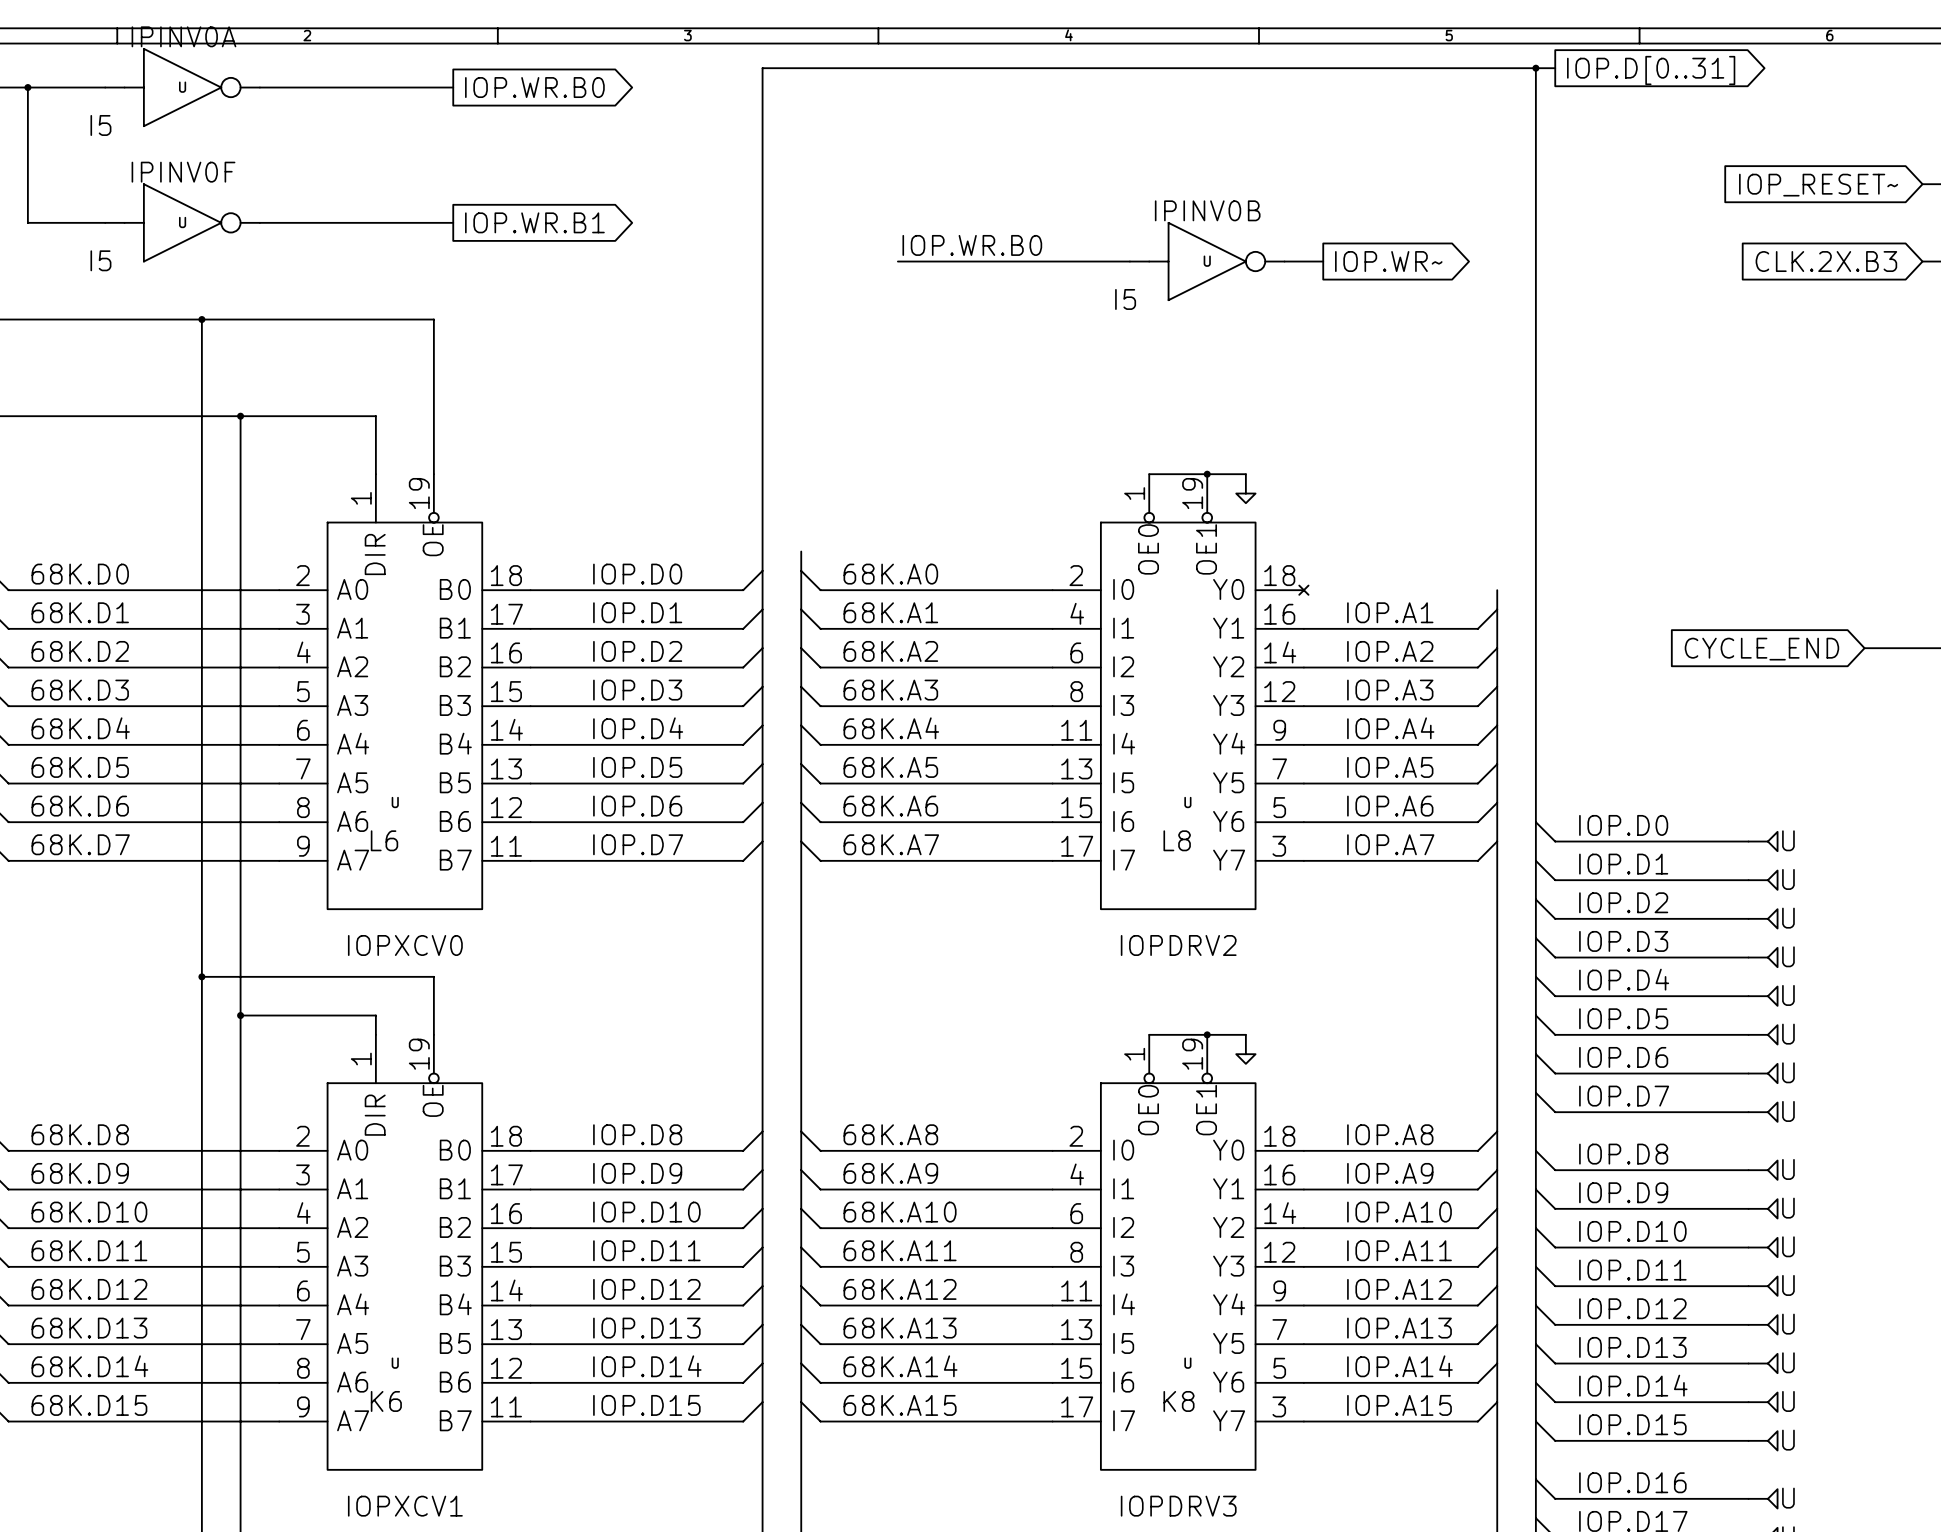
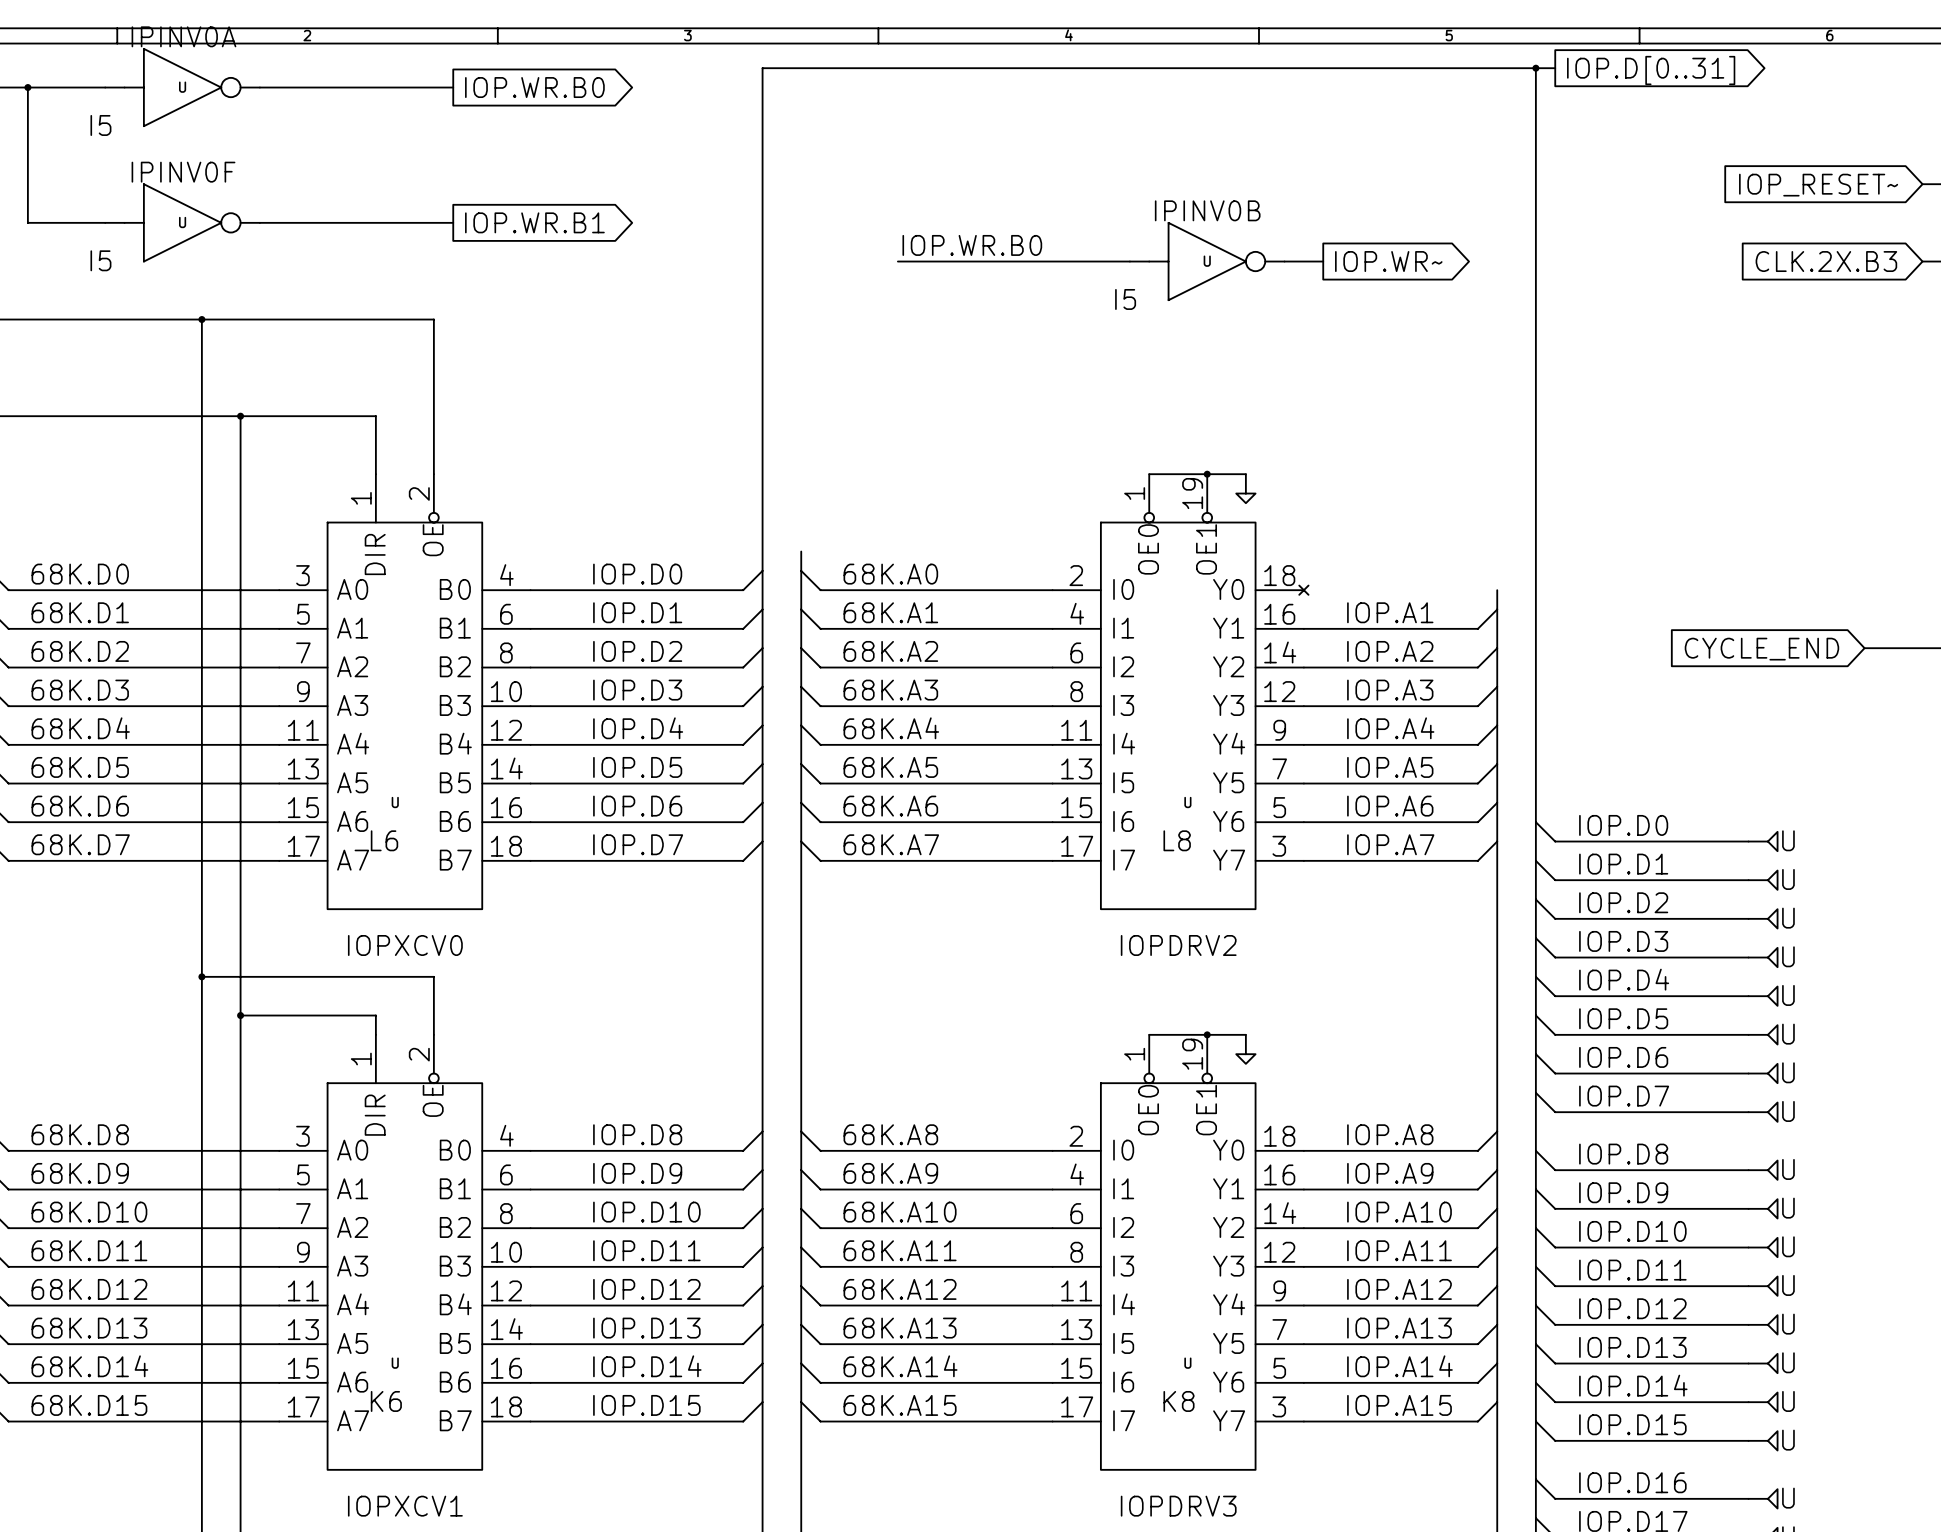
U symbol: [279, 474, 531, 910] -> [279, 474, 531, 910]
U symbol: [279, 1034, 531, 1470] -> [279, 1034, 531, 1470]

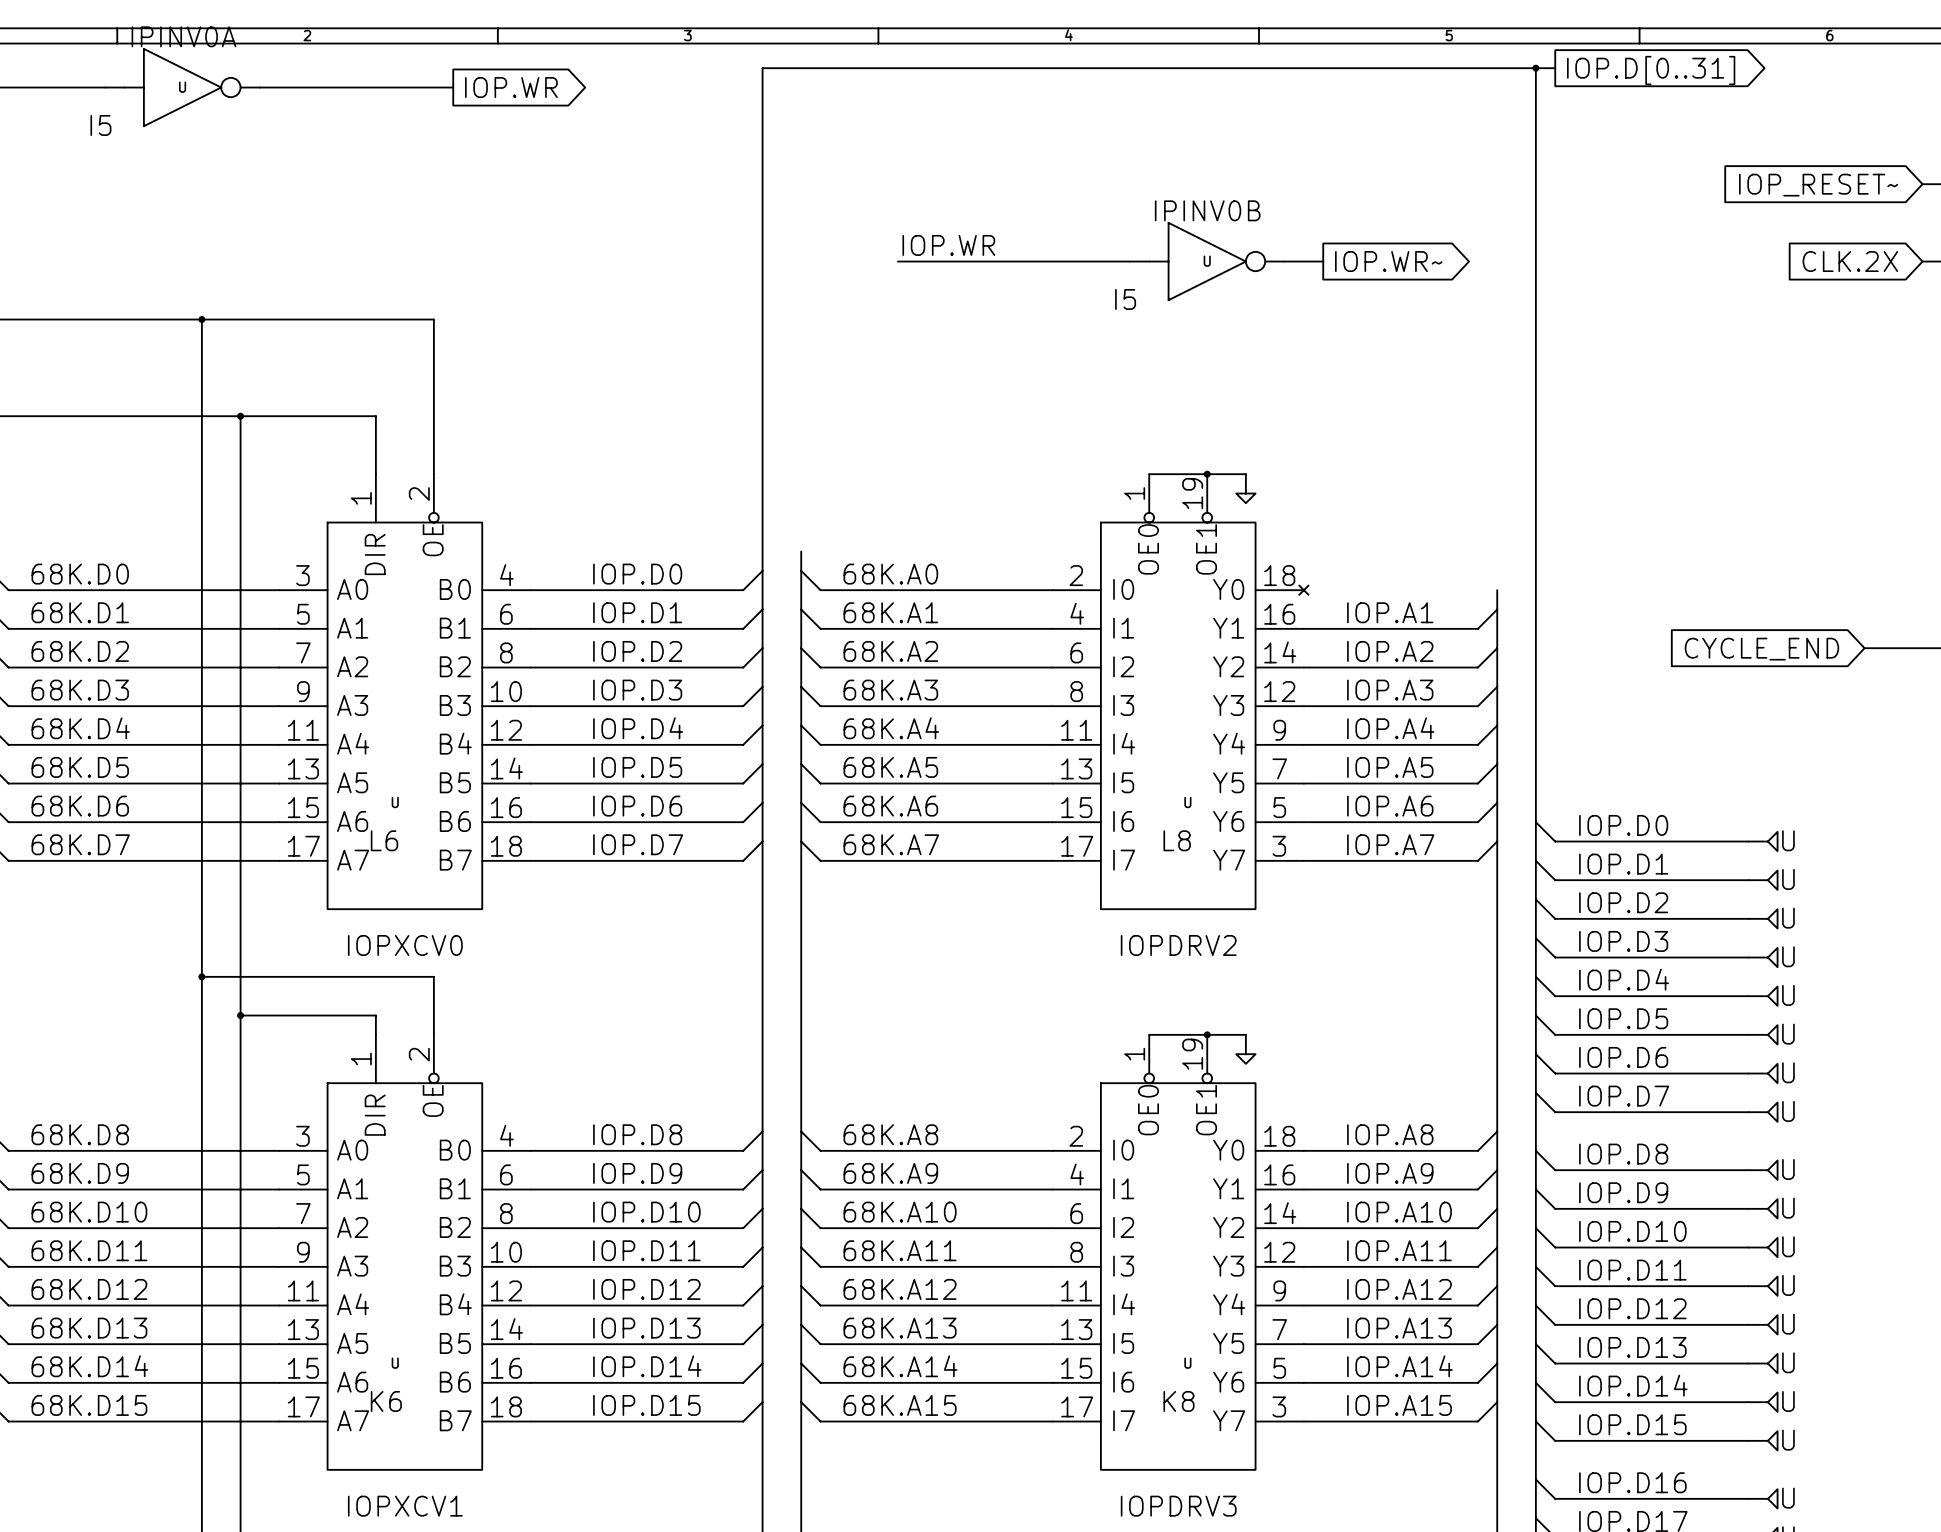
wire: (27, 87) (27, 222) (105, 222) -> none
junction: (27, 87) -> none
global label: IOP.WR.B0 (534, 87) -> IOP.WR (511, 87)
U: (182, 222) -> none
wire: (259, 222) (453, 222) -> none
global label: IOP.WR.B1 (534, 222) -> none
label: IOP.WR.B0 (972, 245) -> IOP.WR (948, 245)
global label: CLK.2X.B3 (1826, 261) -> CLK.2X (1850, 261)

